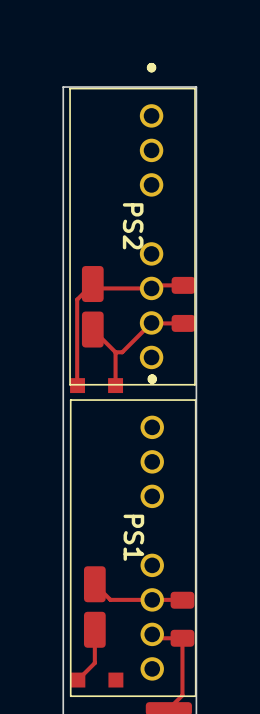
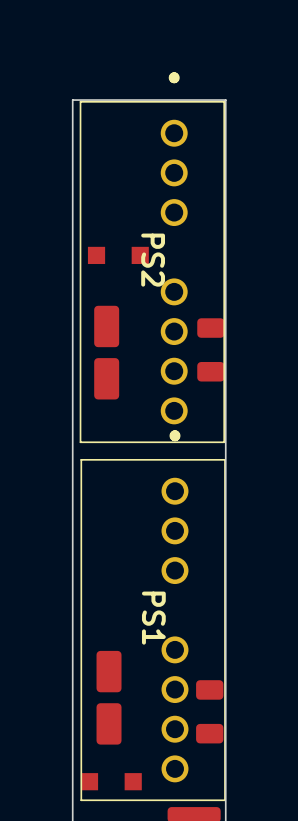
top track: (183, 285) (154, 285) (151, 288) (97, 288) (92, 284) (77, 299) (77, 385) -> none
top track: (183, 323) (151, 322) (122, 352) (115, 352) -> none
top track: (92, 329) (115, 352) -> none
top track: (115, 352) (115, 385) -> none
part position: (96, 385) -> (118, 255)
top track: (94, 584) (110, 599) (182, 600) -> none
top track: (94, 629) (94, 663) (77, 680) -> none
top track: (152, 634) (156, 638) (182, 638) (182, 695) (168, 708) -> none

